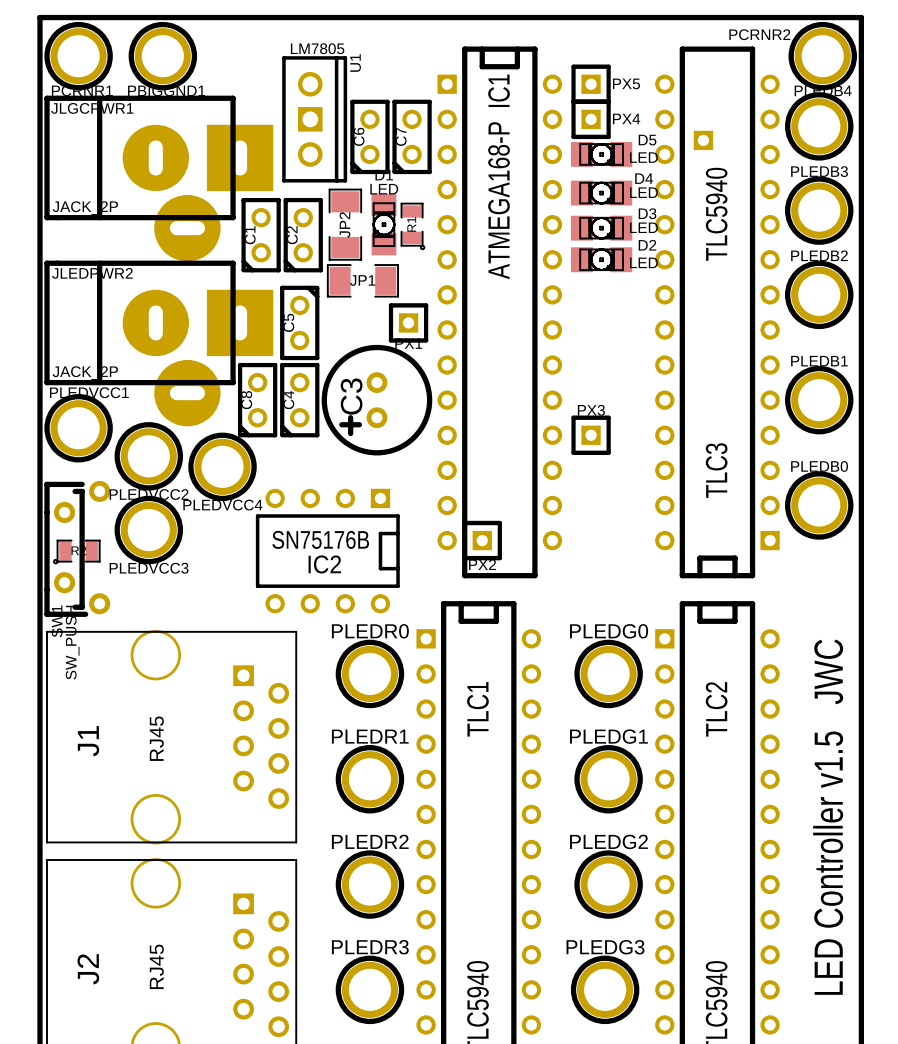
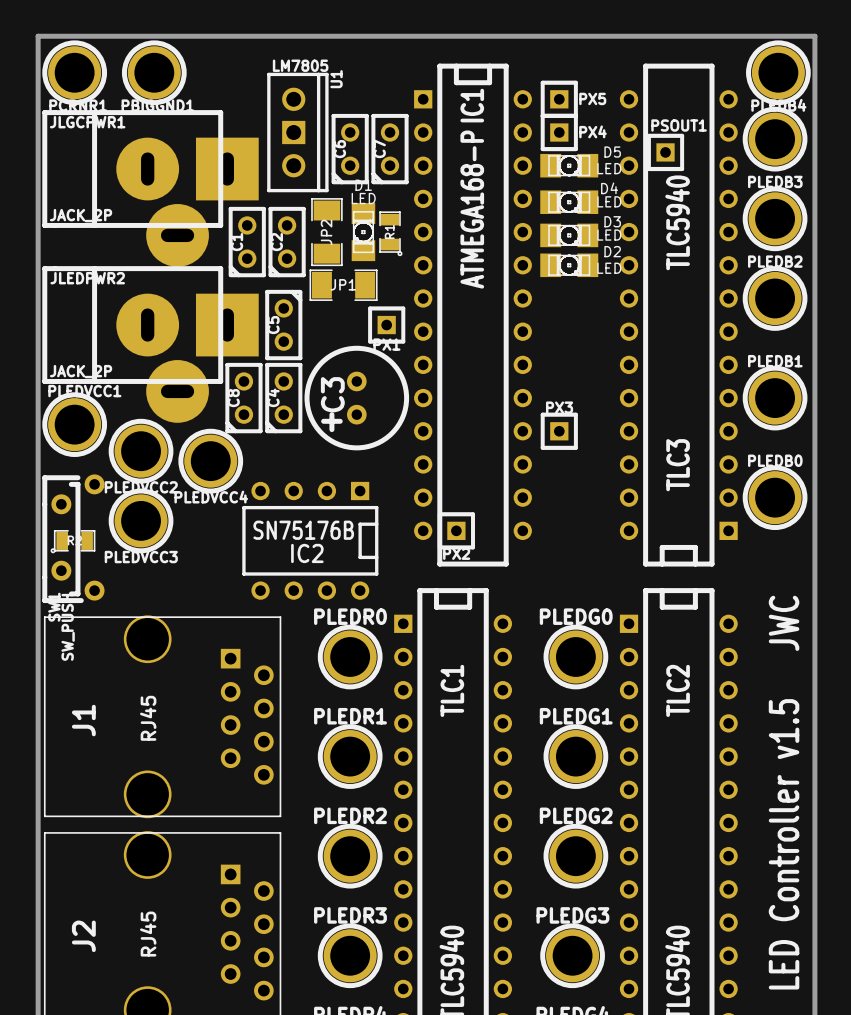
PCRNR2 name: PCRNR2 (759, 34) -> none
PSOUT1 side: bottom (703, 140) -> top (665, 152)

